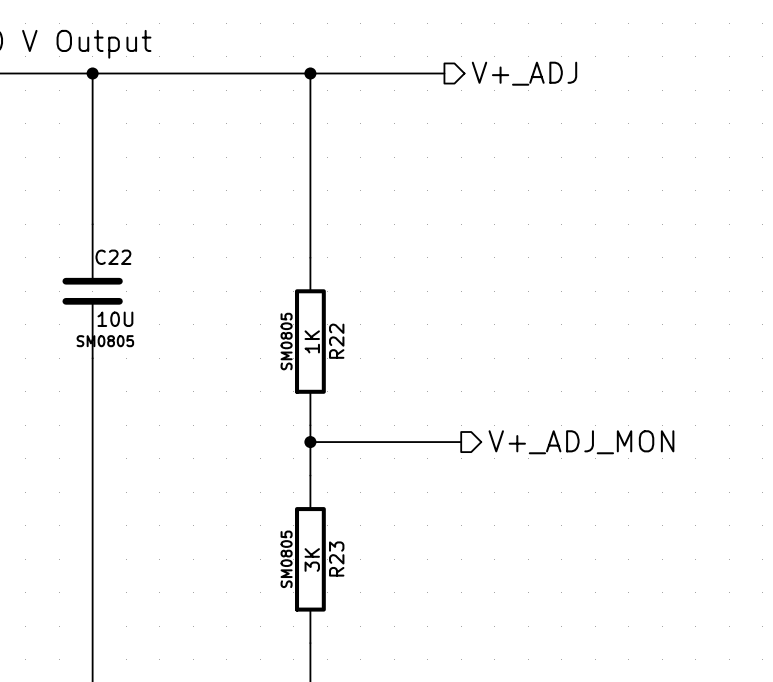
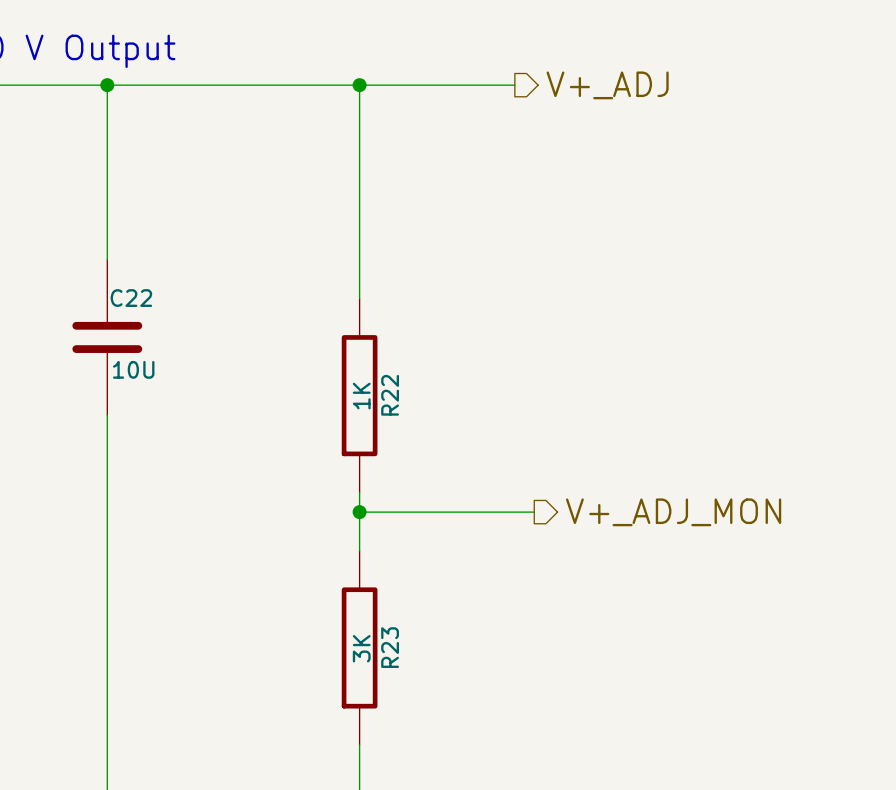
C22 text: SM0805 (105, 341) -> none
R22 text: SM0805 (286, 341) -> none
R23 text: SM0805 (286, 559) -> none

